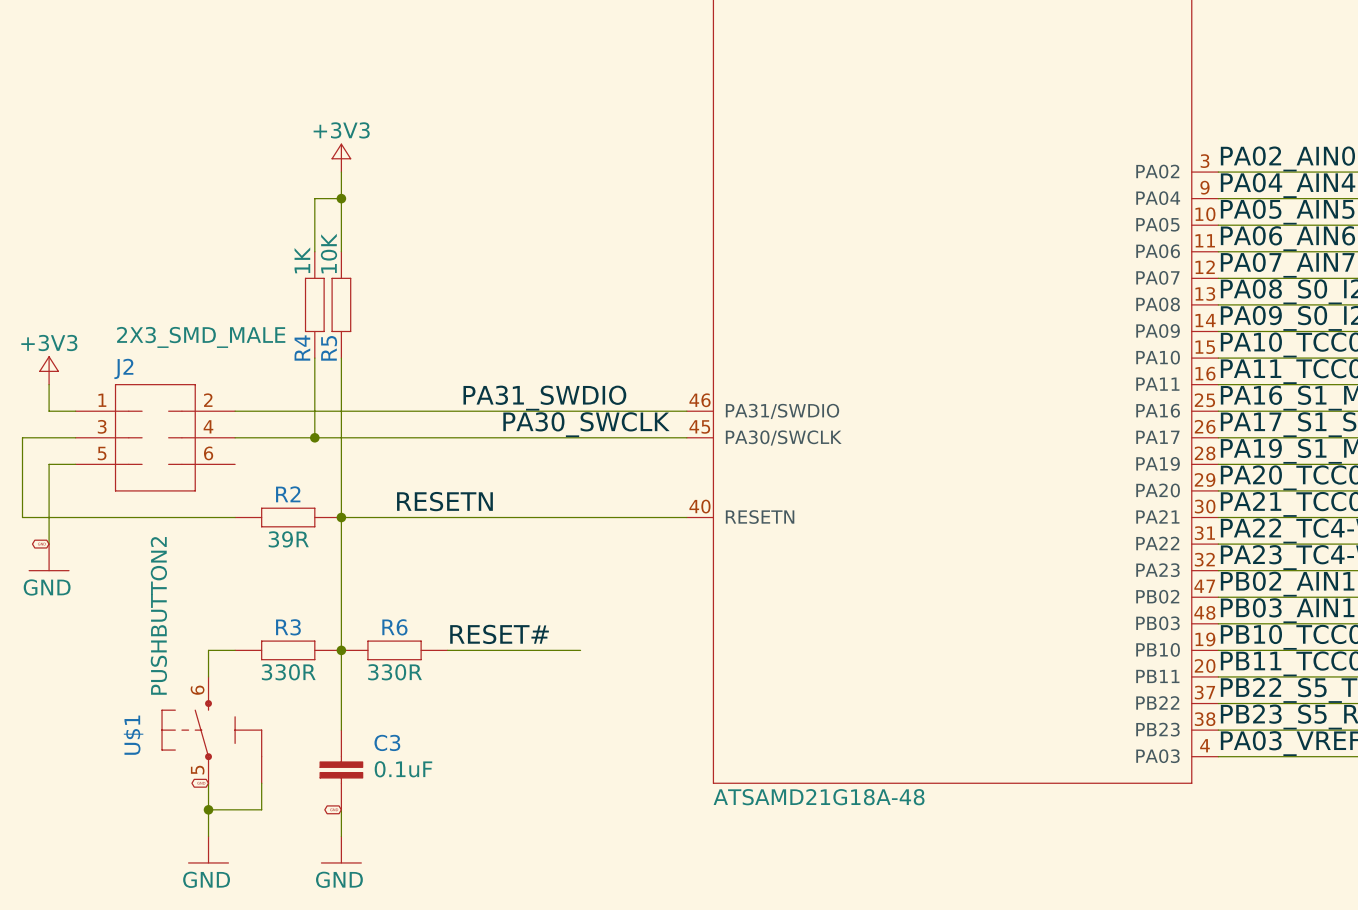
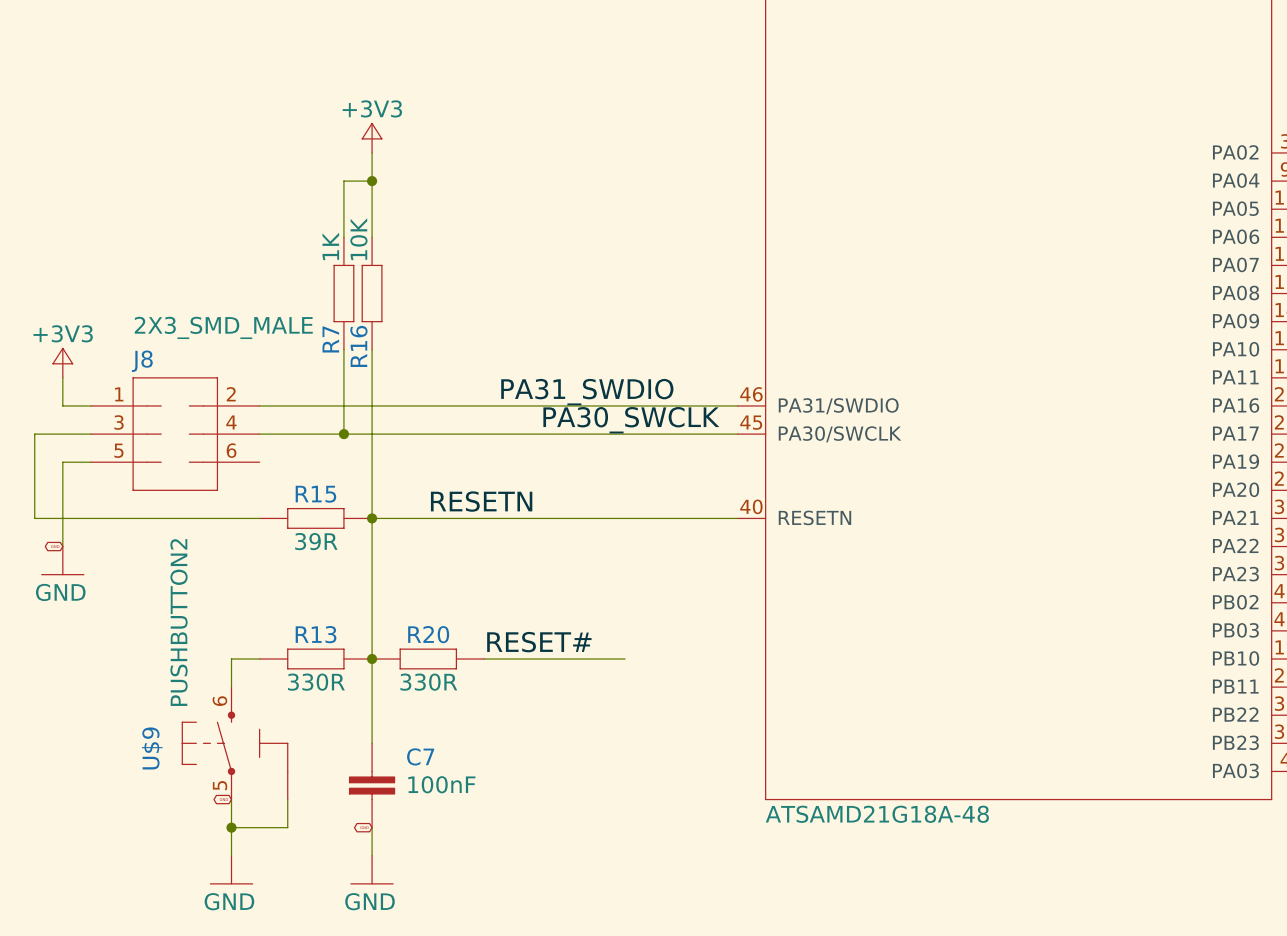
R4 name: R4 (302, 348) -> R7 (330, 339)
R5 name: R5 (329, 348) -> R16 (358, 346)
J2 name: J2 (123, 368) -> J8 (142, 361)
R2 name: R2 (288, 494) -> R15 (315, 494)
R3 name: R3 (288, 627) -> R13 (316, 634)
R6 name: R6 (394, 627) -> R20 (428, 634)
U$1 name: U$1 (133, 735) -> U$9 (152, 748)
C3 name: C3 (387, 742) -> C7 (420, 756)
C3 value: 0.1uF (403, 769) -> 100nF (441, 784)

